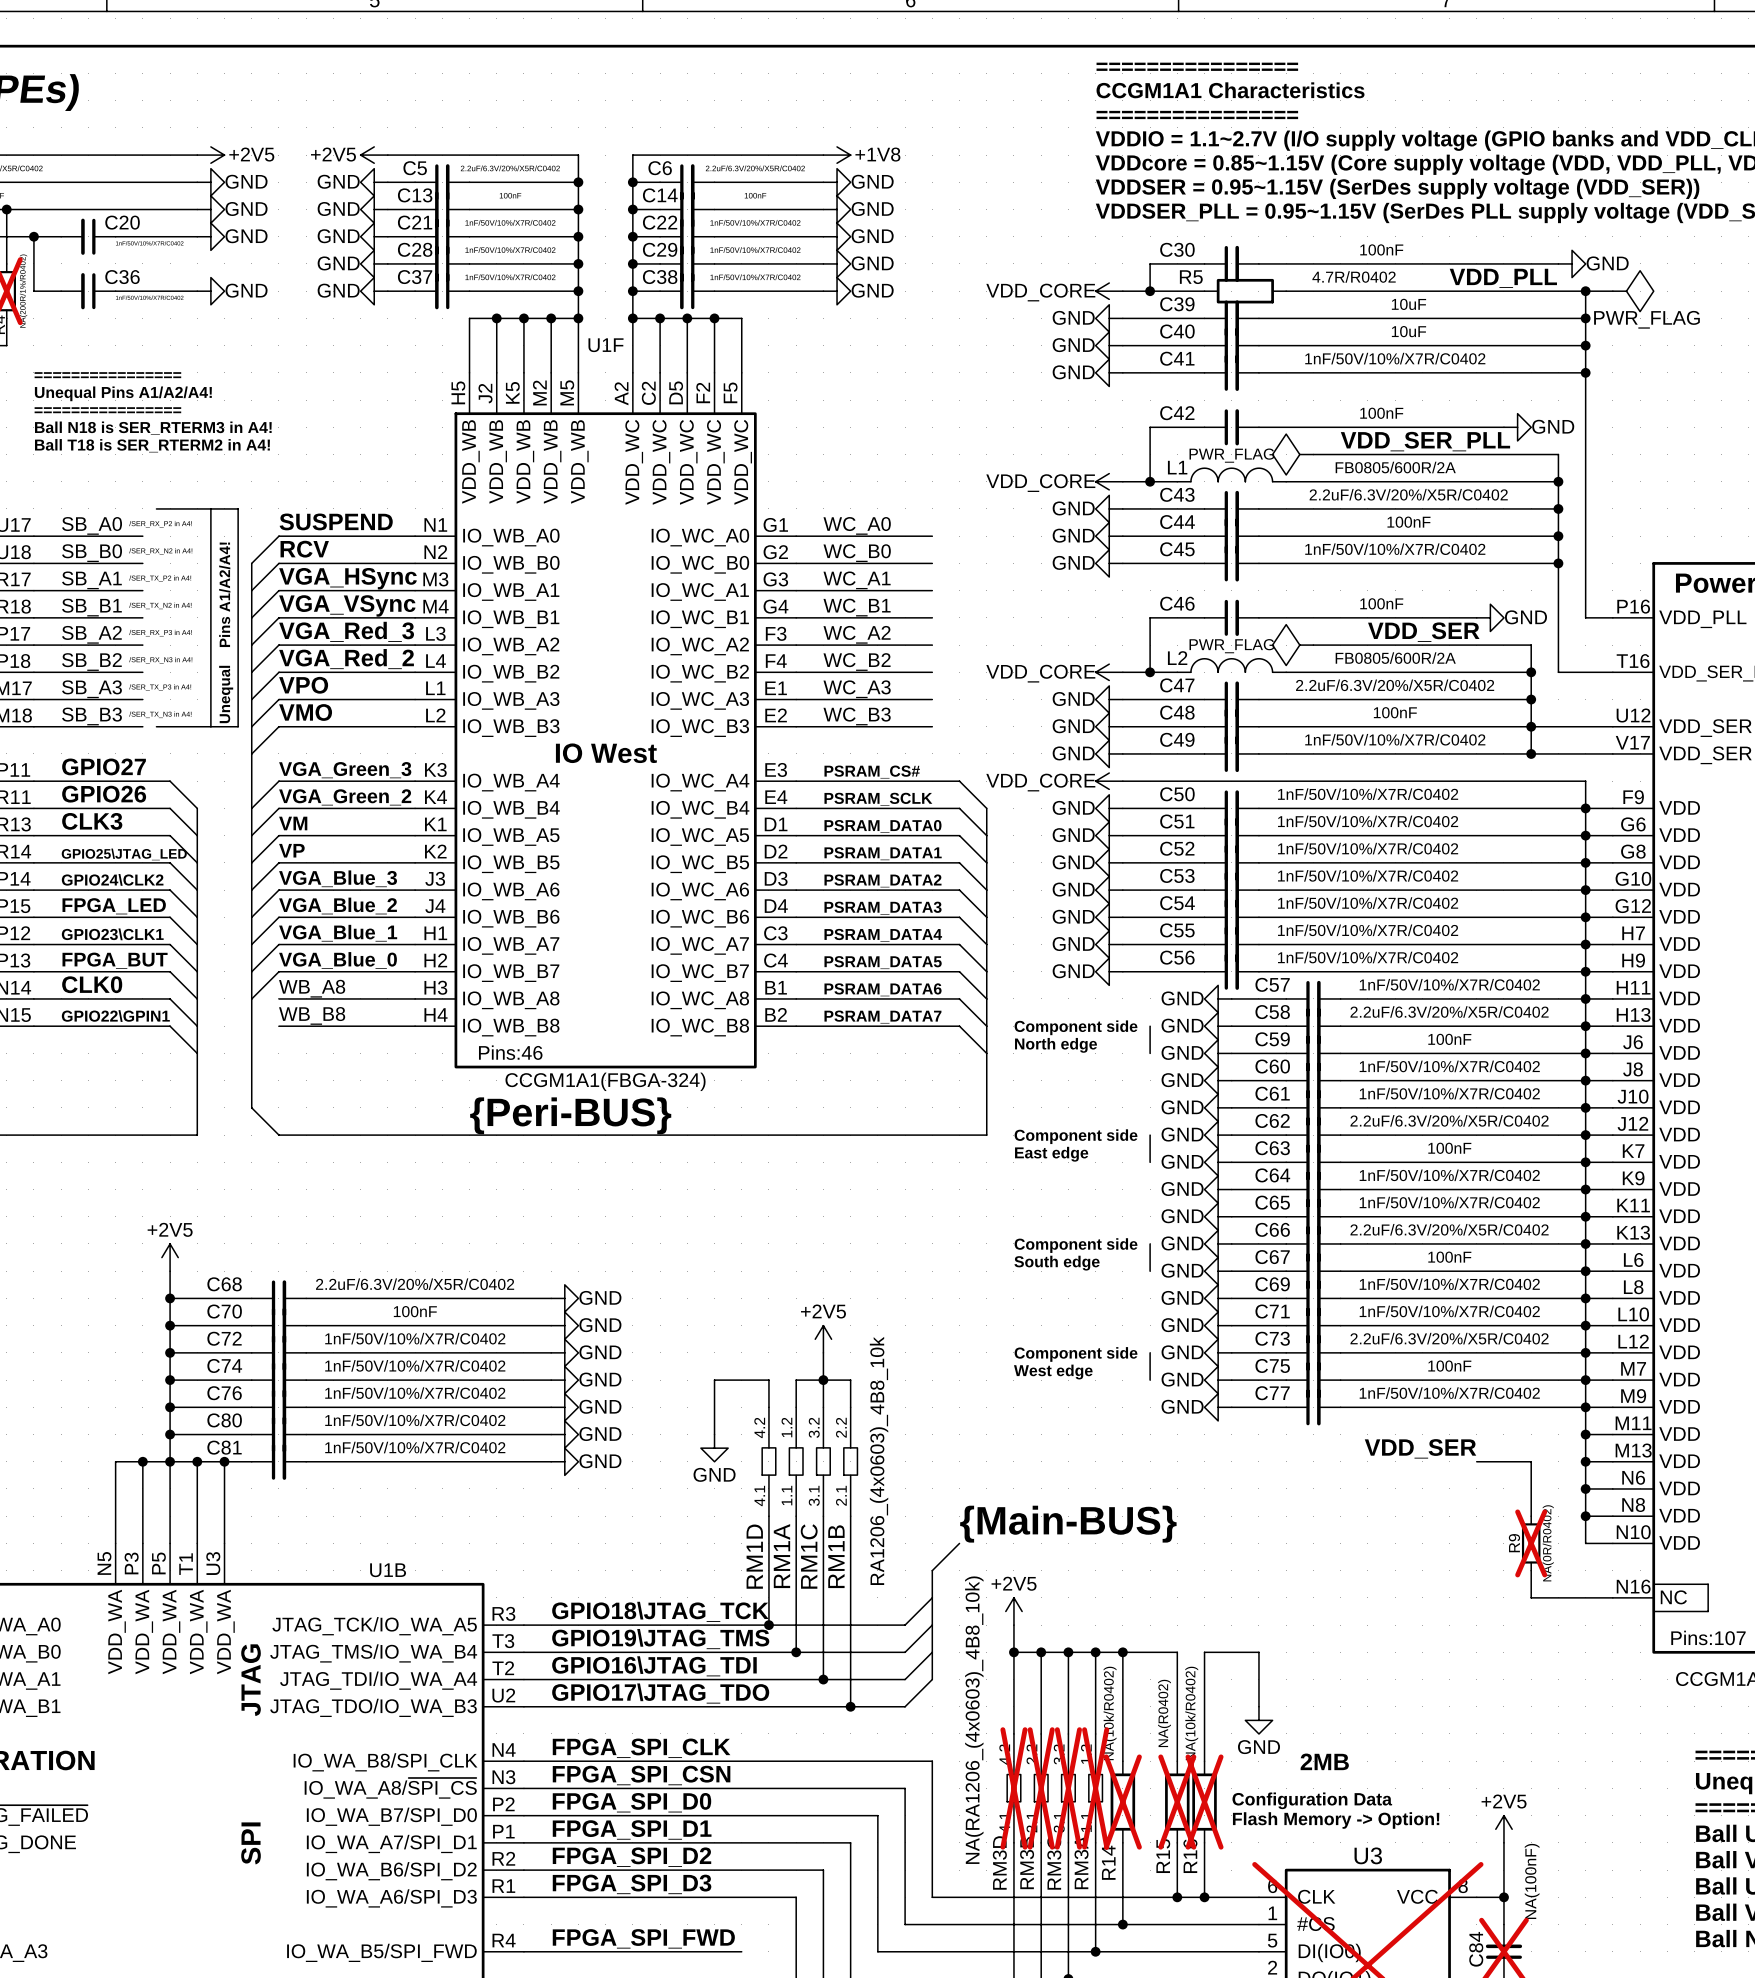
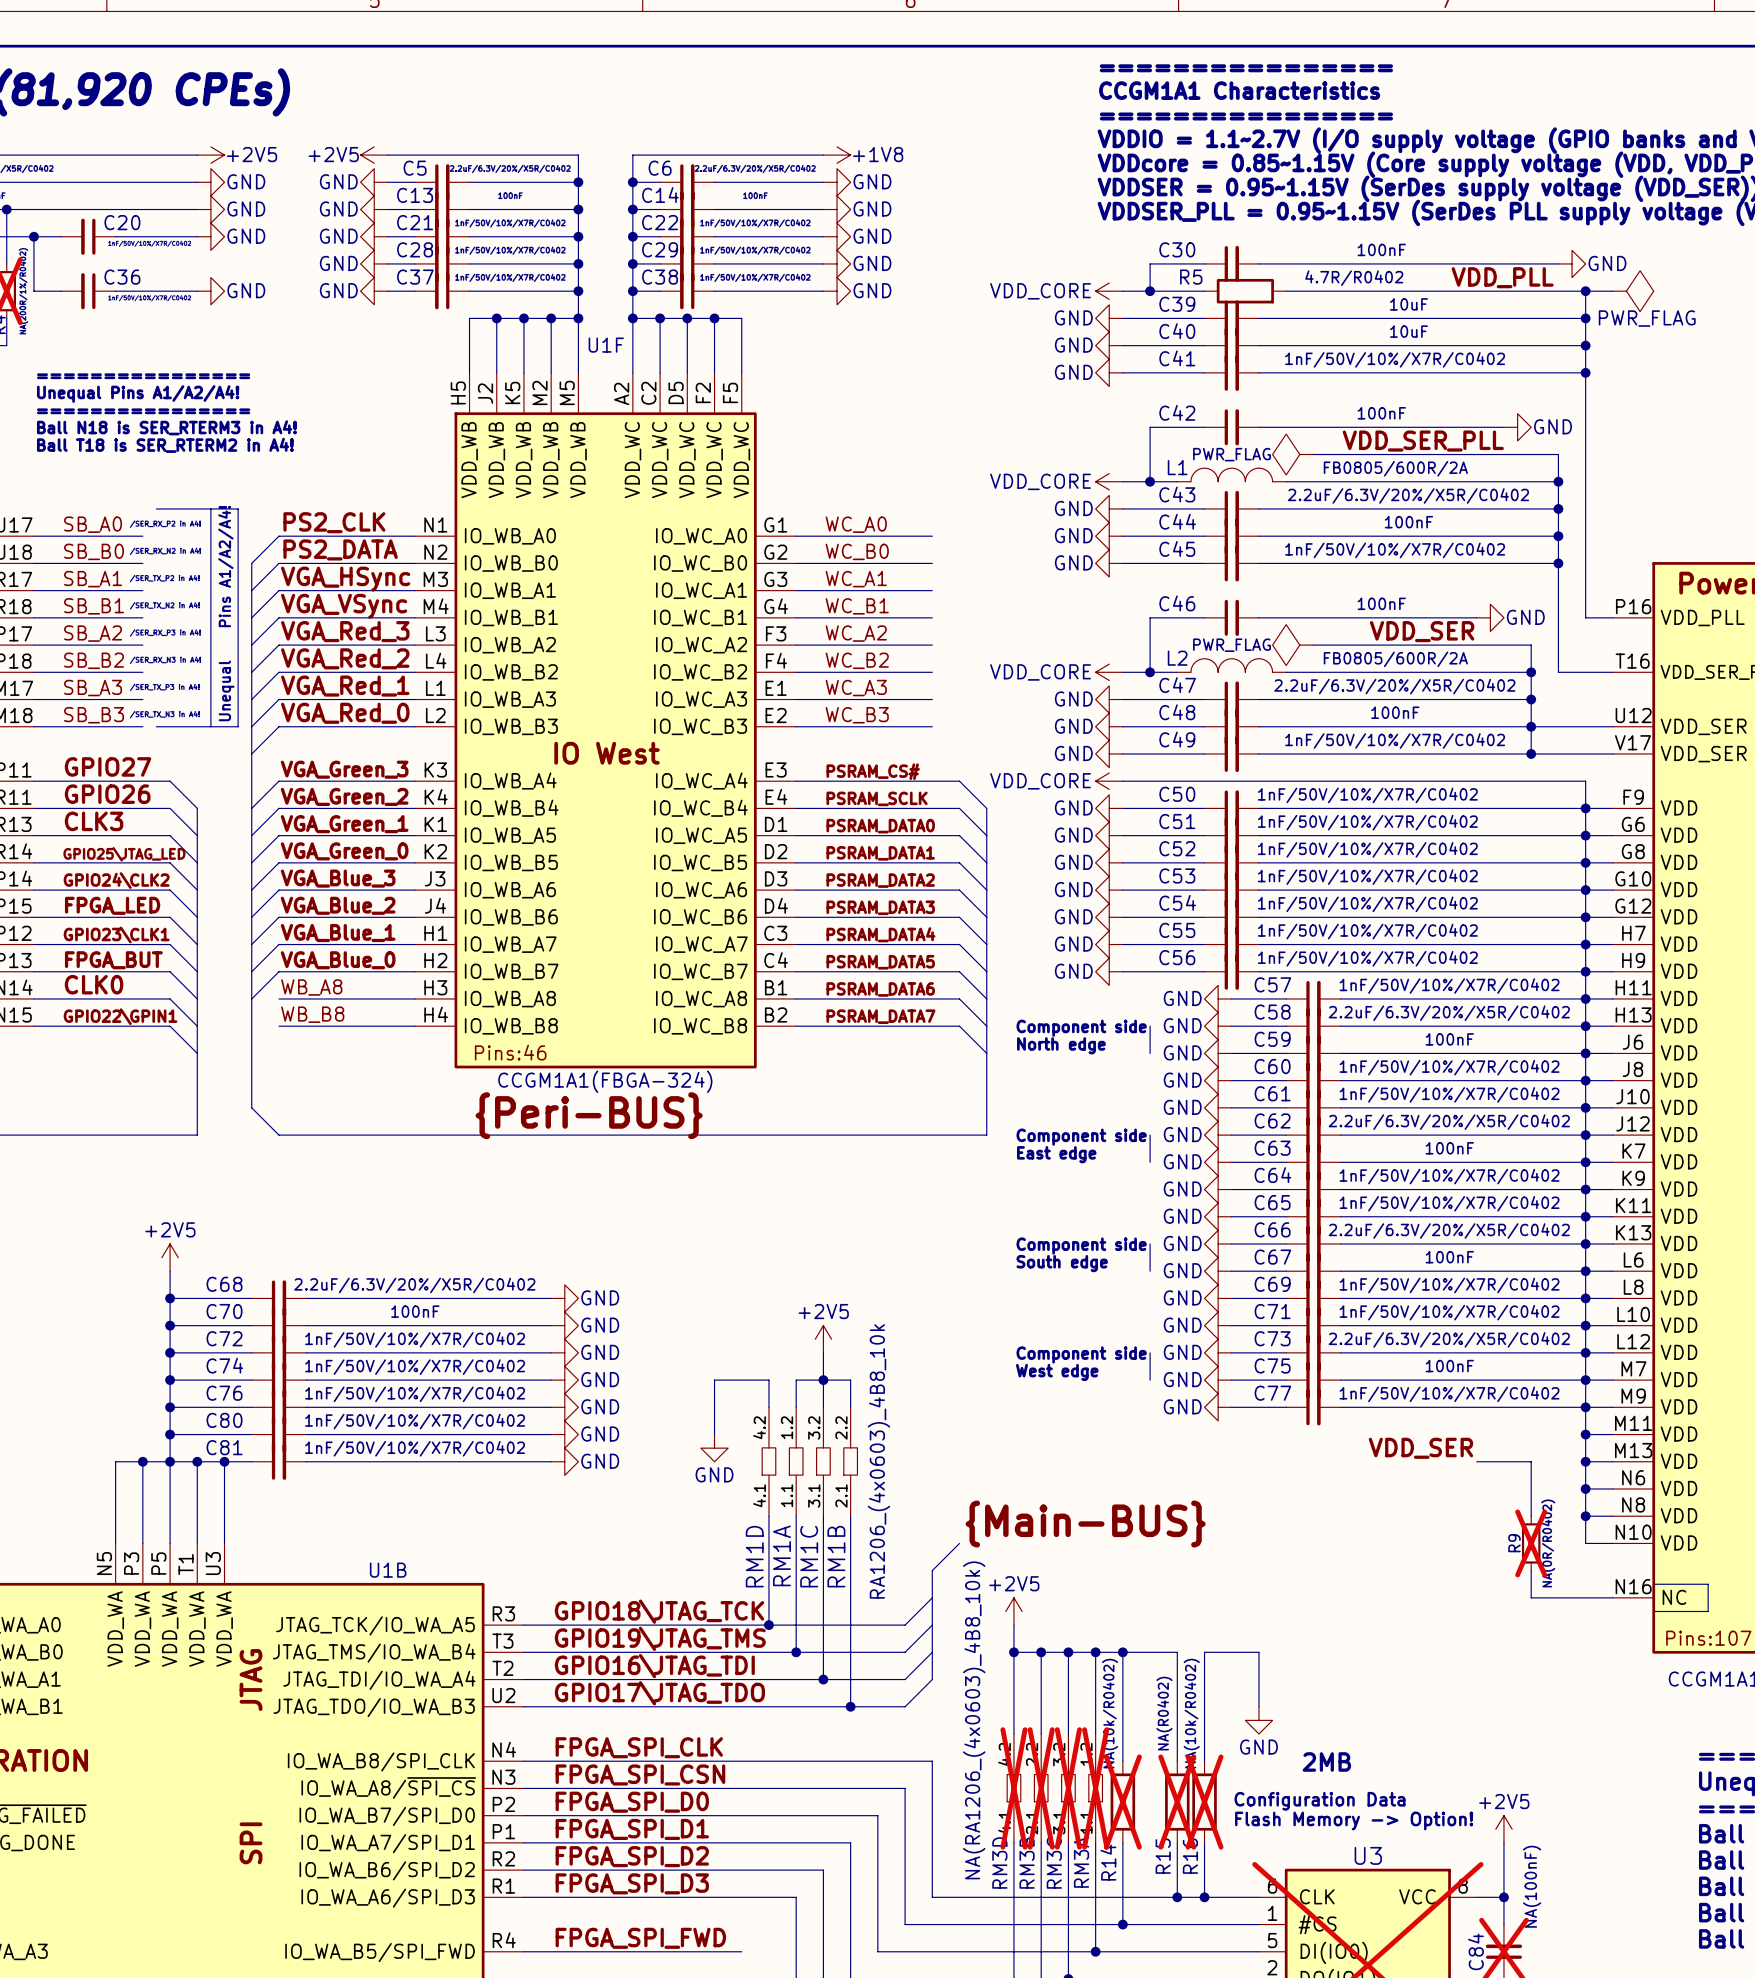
label: SUSPEND (336, 521) -> PS2_CLK (334, 522)
label: RCV (304, 549) -> PS2_DATA (340, 549)
label: VPO (303, 685) -> VGA_Red_1 (345, 686)
label: VMO (305, 712) -> VGA_Red_0 (345, 713)
label: VM (293, 823) -> VGA_Green_1 (344, 824)
label: VP (291, 850) -> VGA_Green_0 (344, 851)

